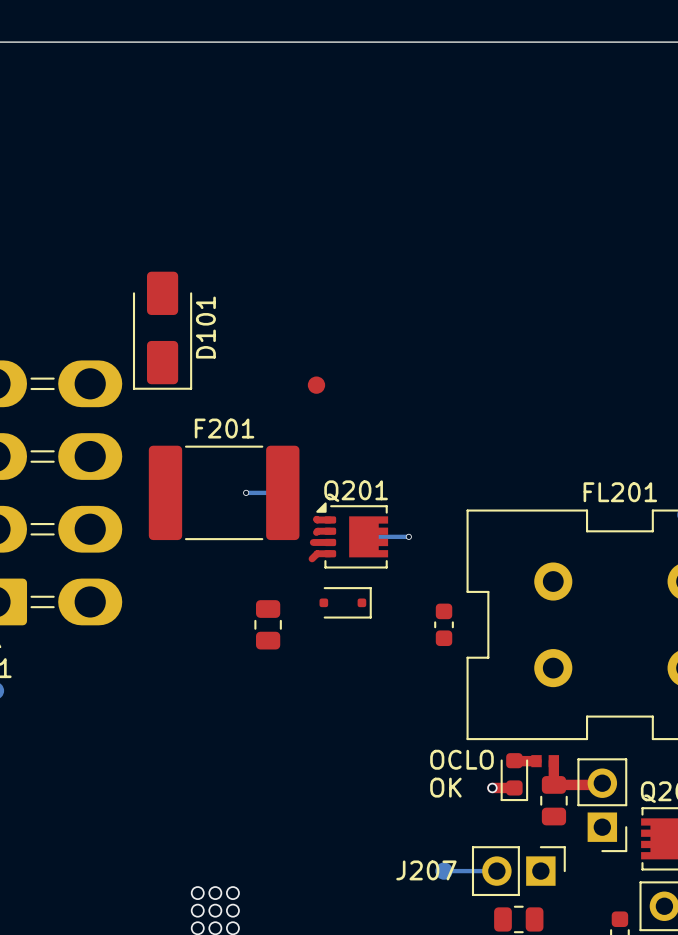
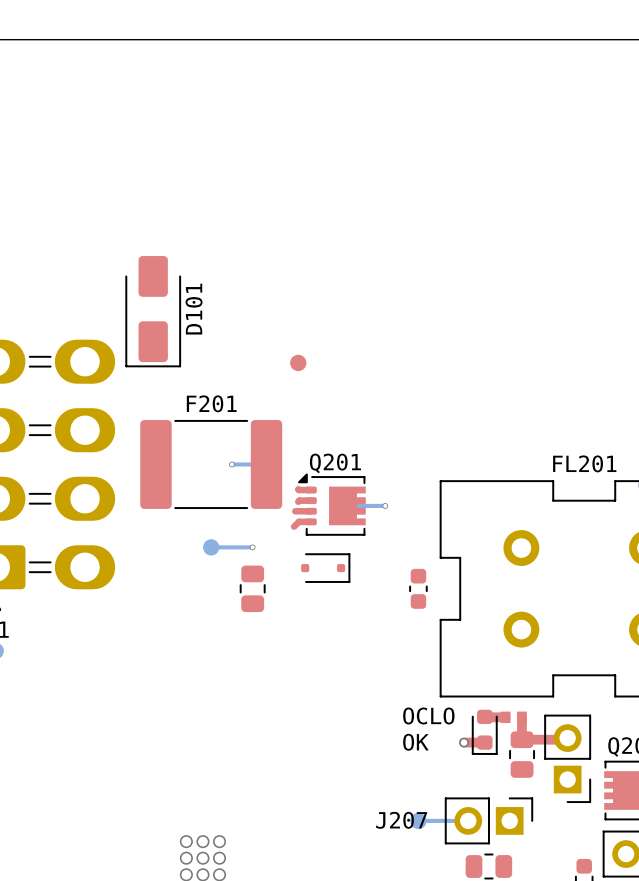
bottom track: none -> (211, 547) (252, 547)
part: none -> (211, 547)
via: none -> (252, 547)

